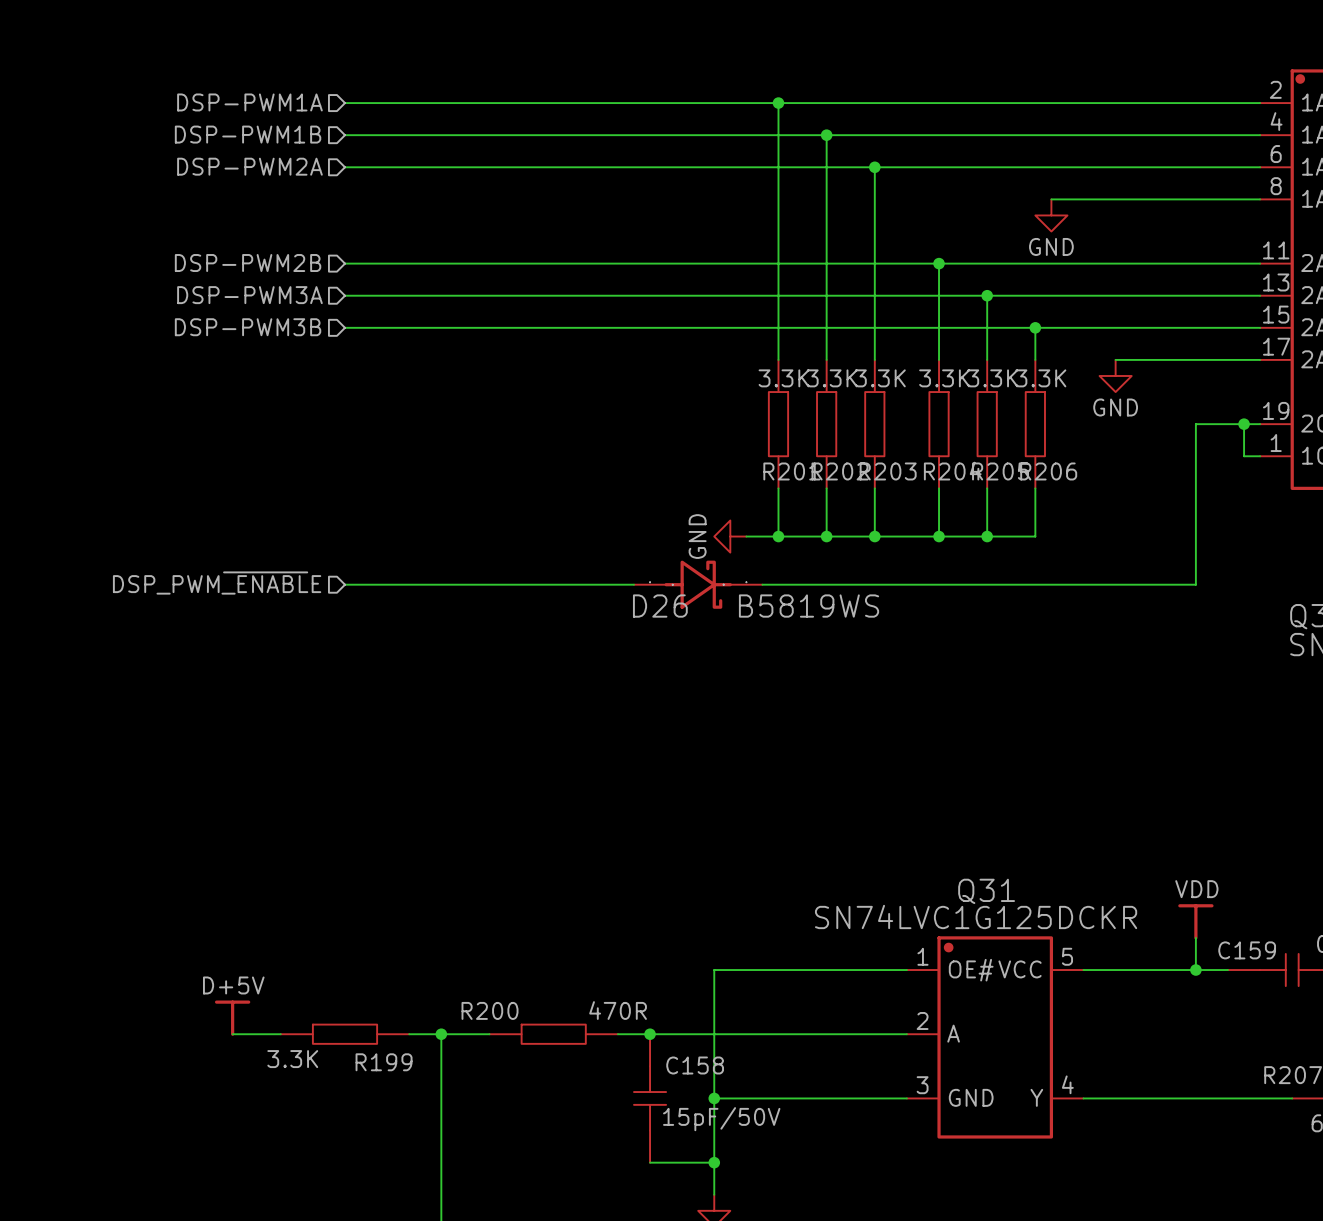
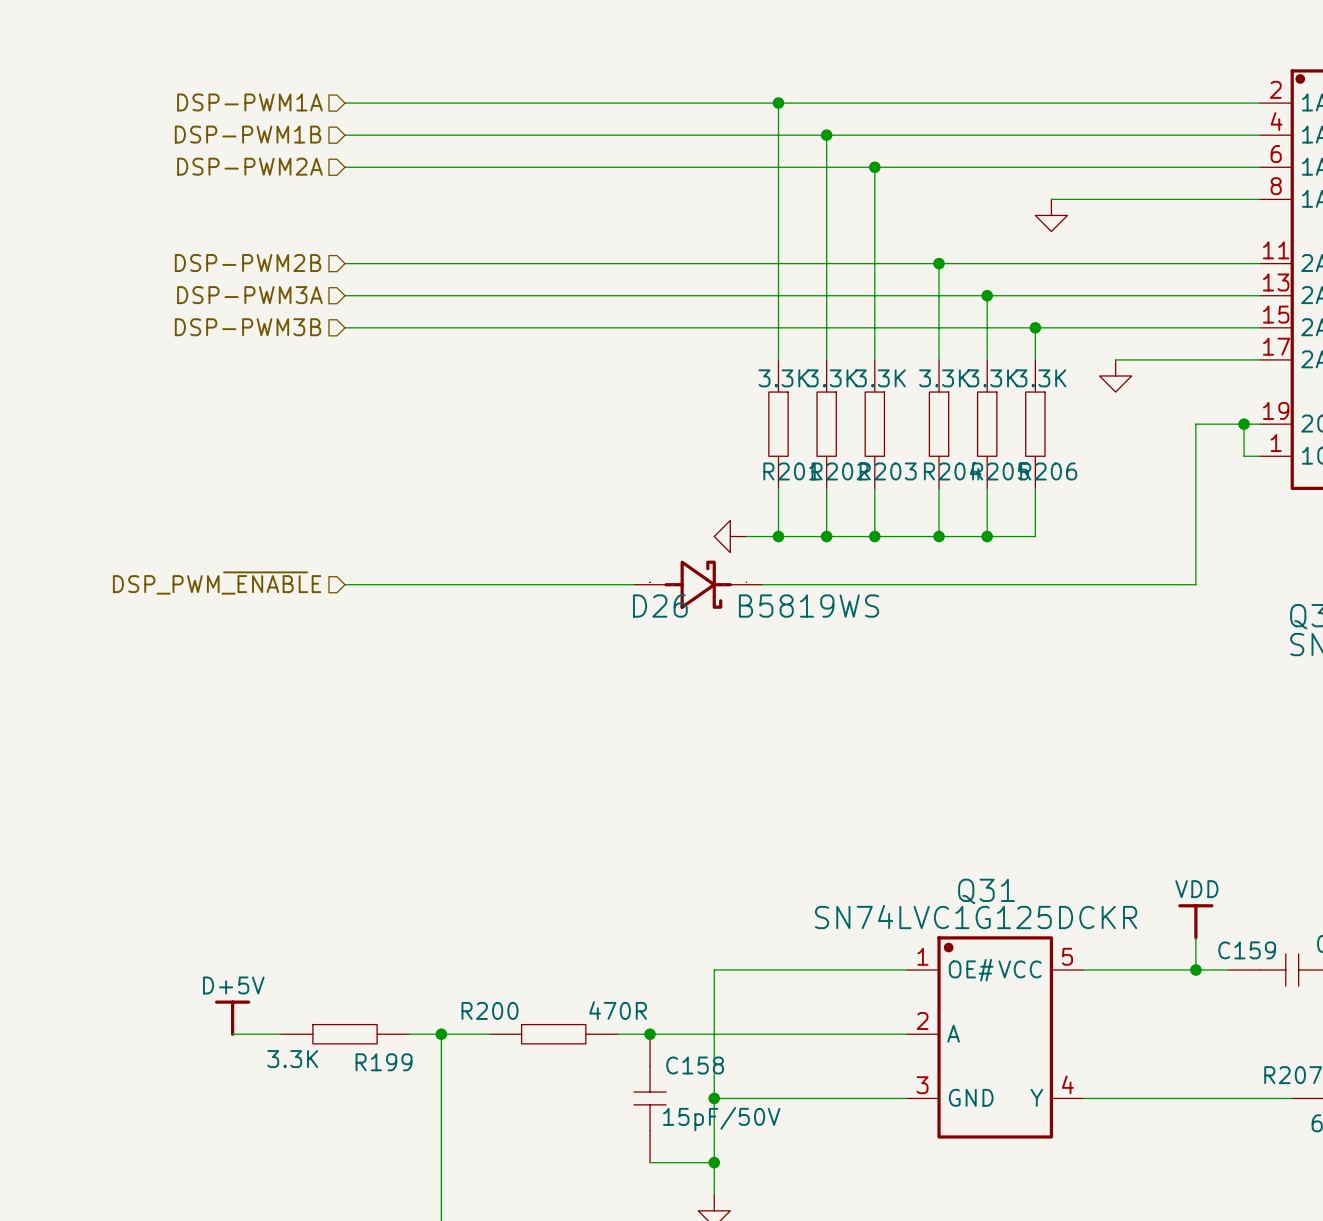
power symbol text: GND (1051, 246) -> none
power symbol text: GND (1115, 407) -> none
power symbol text: GND (697, 536) -> none

